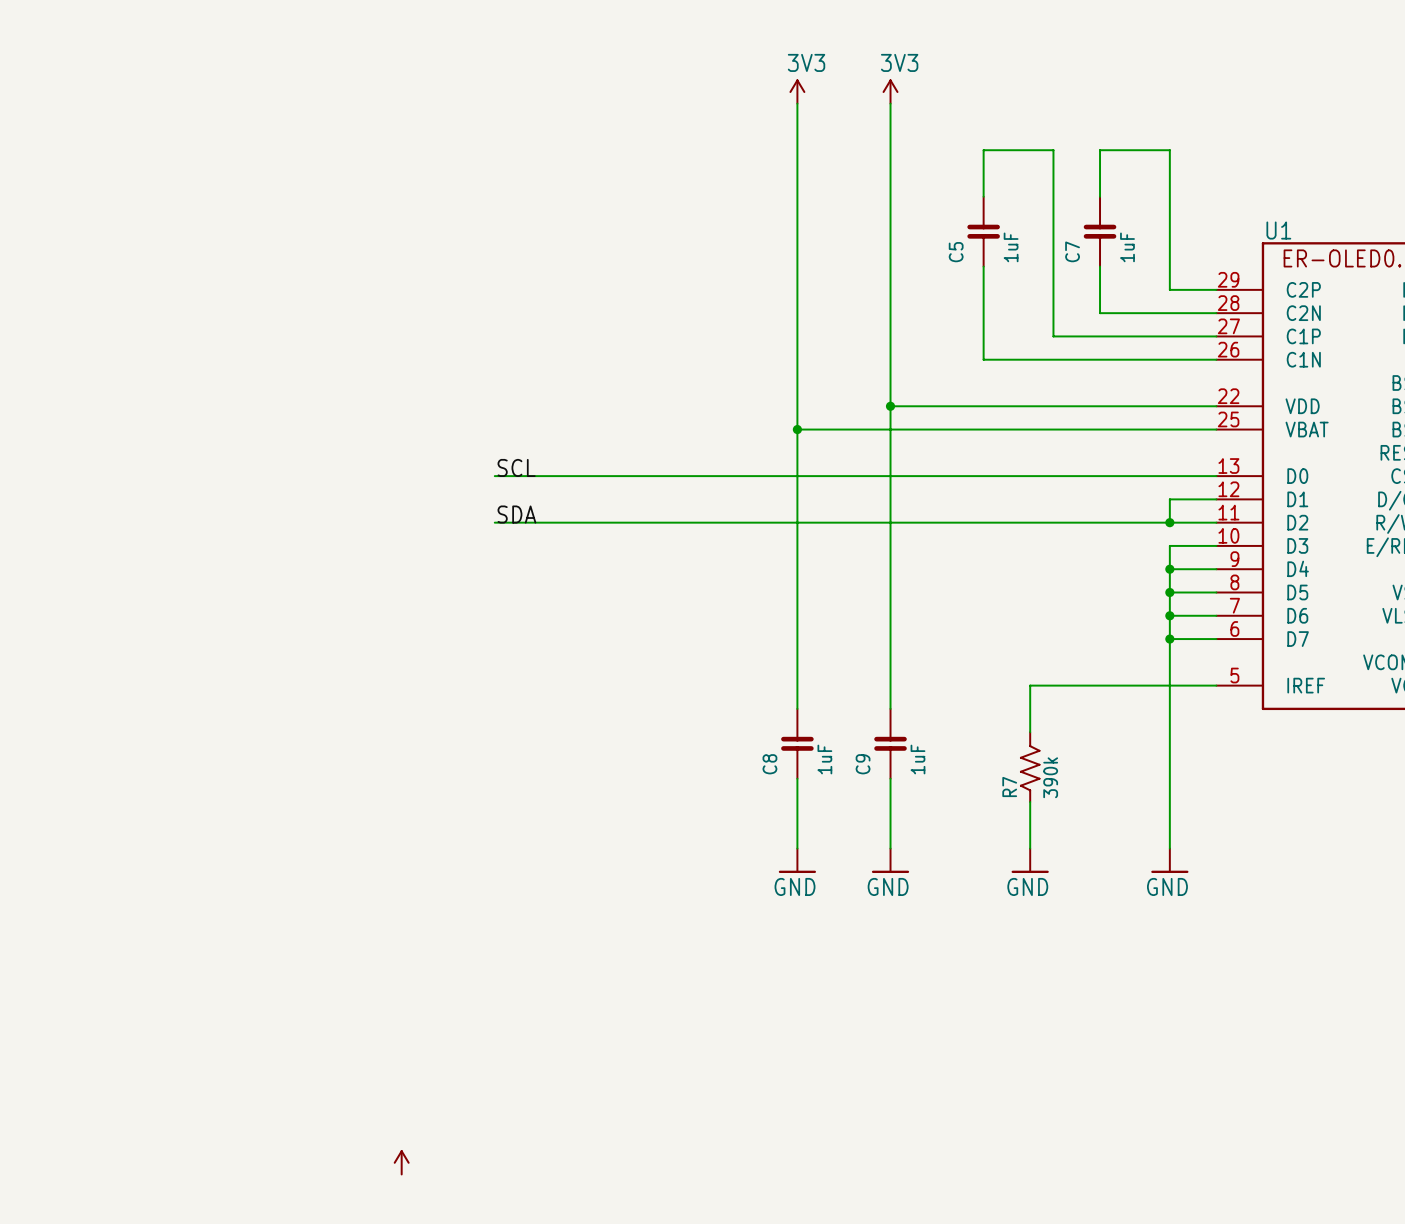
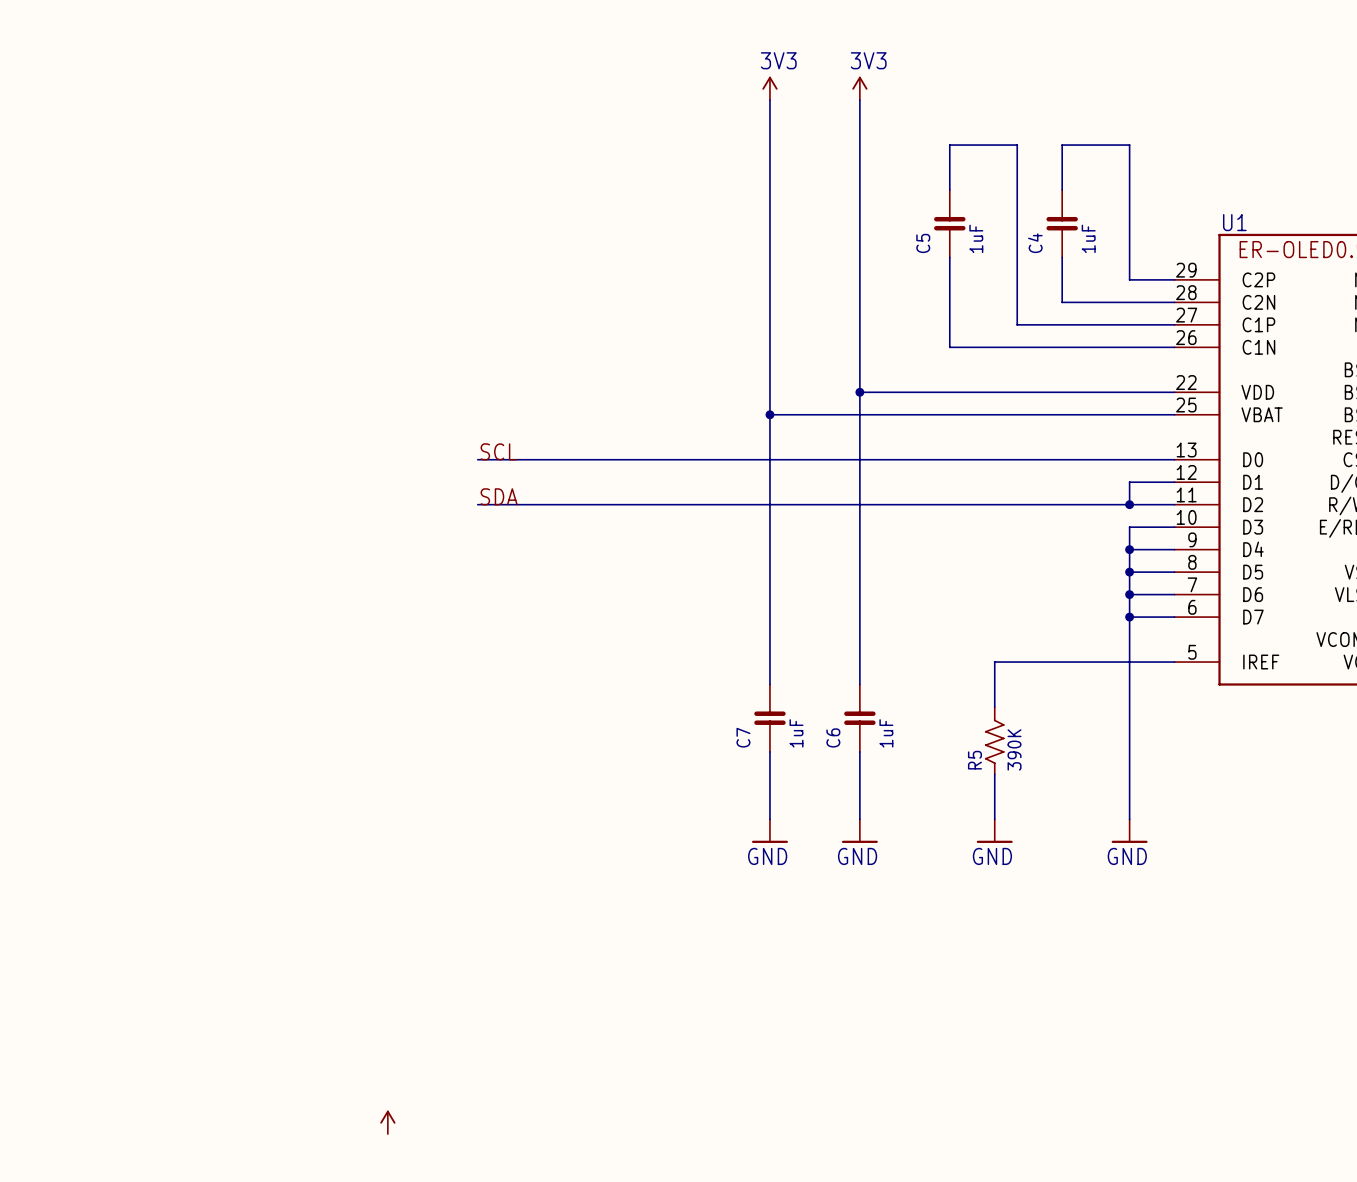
C7 name: C7 (1072, 251) -> C4 (1035, 243)
C8 name: C8 (769, 764) -> C7 (743, 737)
C9 name: C9 (863, 764) -> C6 (833, 737)
R7 value: 390k (1050, 777) -> 390K (1014, 749)
R7 name: R7 (1009, 786) -> R5 (974, 760)

